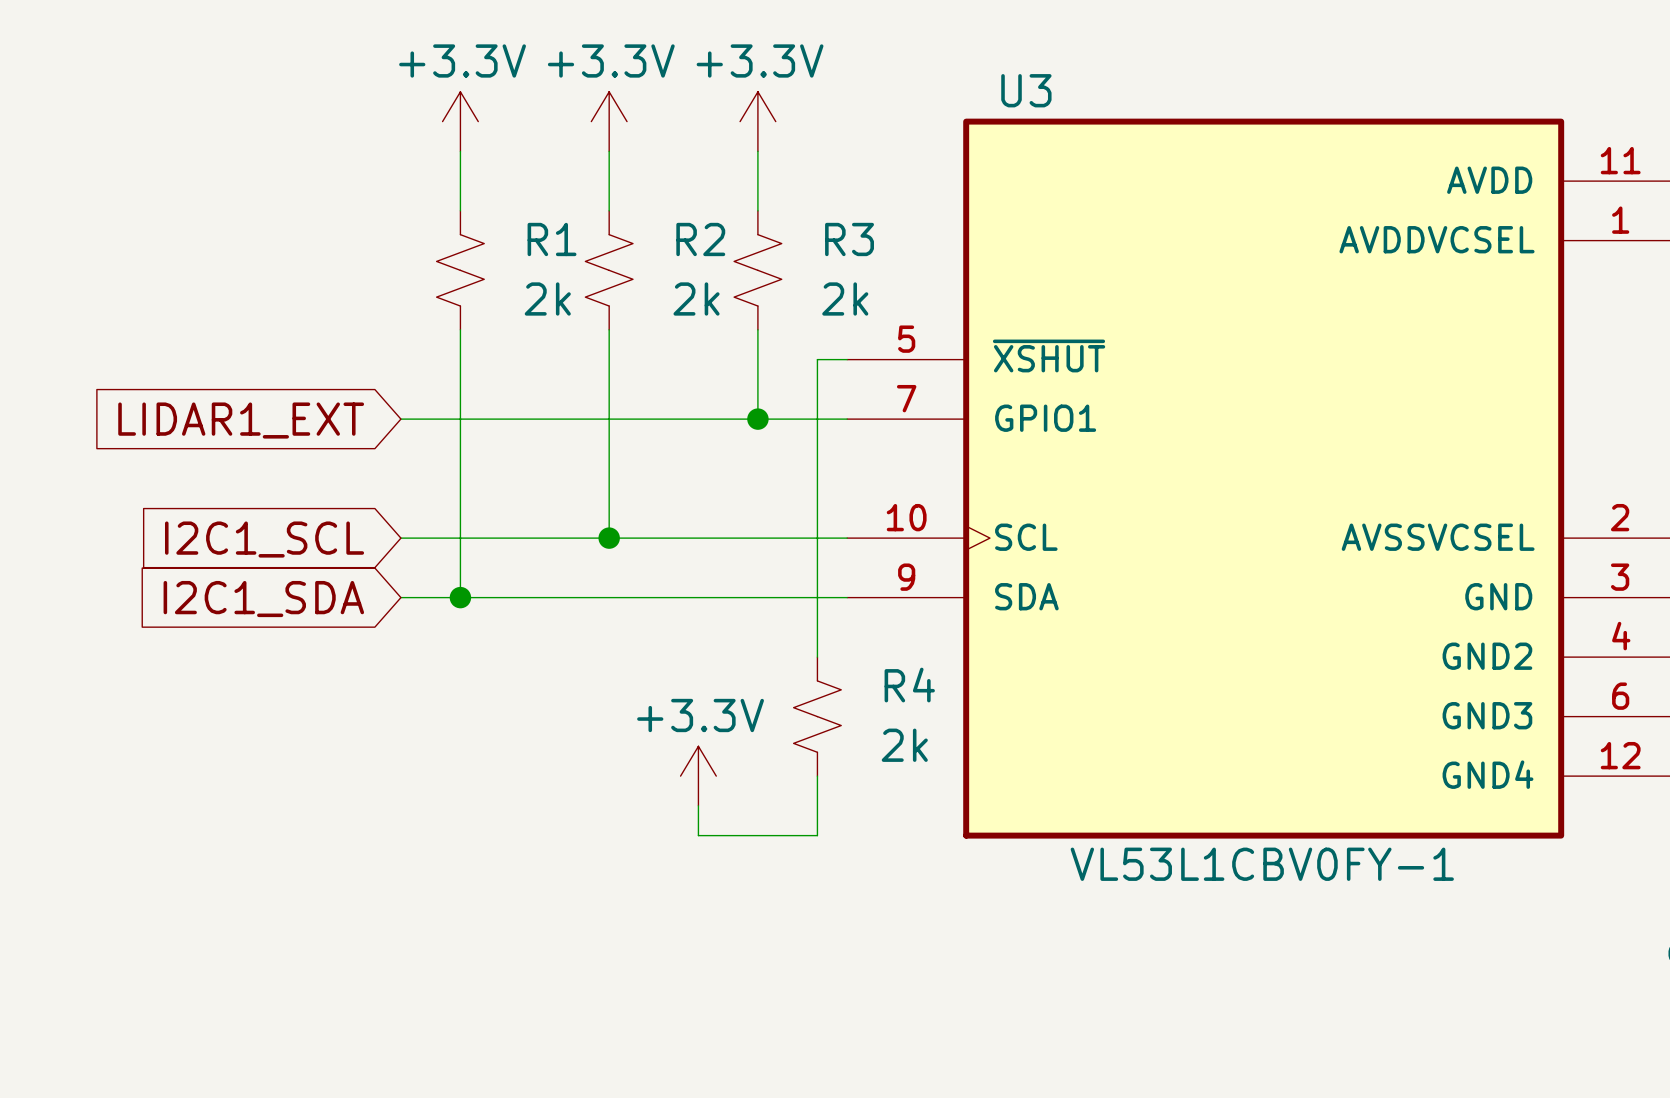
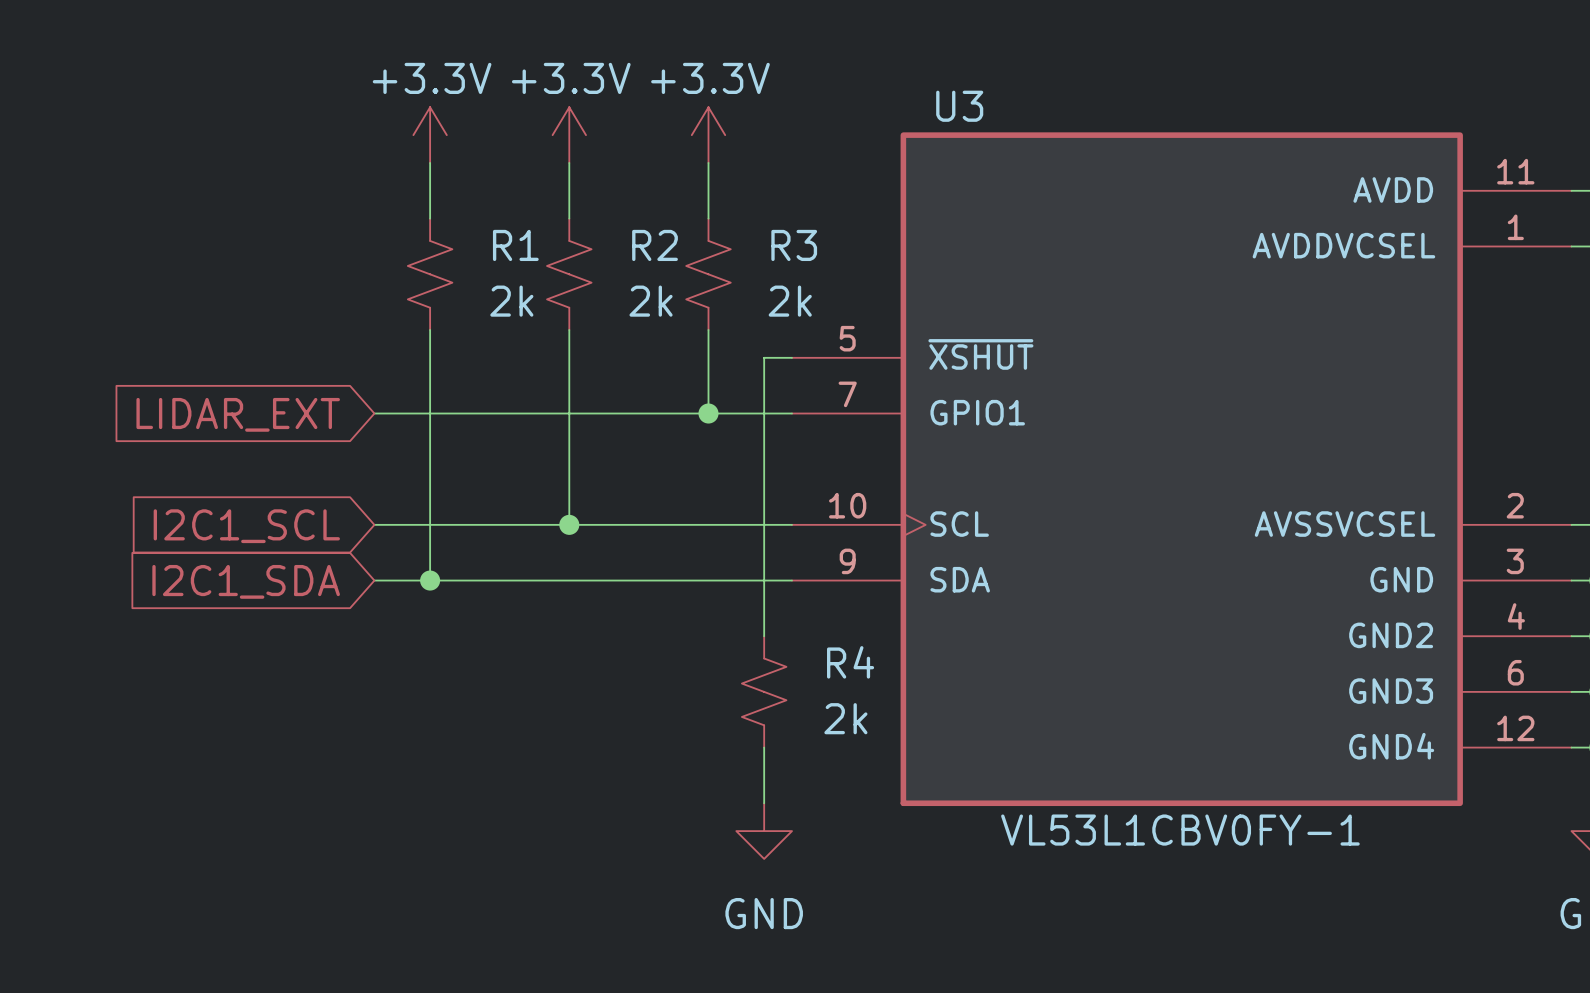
global label: LIDAR1_EXT (241, 420) -> LIDAR_EXT (238, 414)
power symbol: +3.3V (698, 776) -> none
wire: (698, 805) (698, 835) (817, 835) -> none
power symbol: none -> GND (764, 831)

